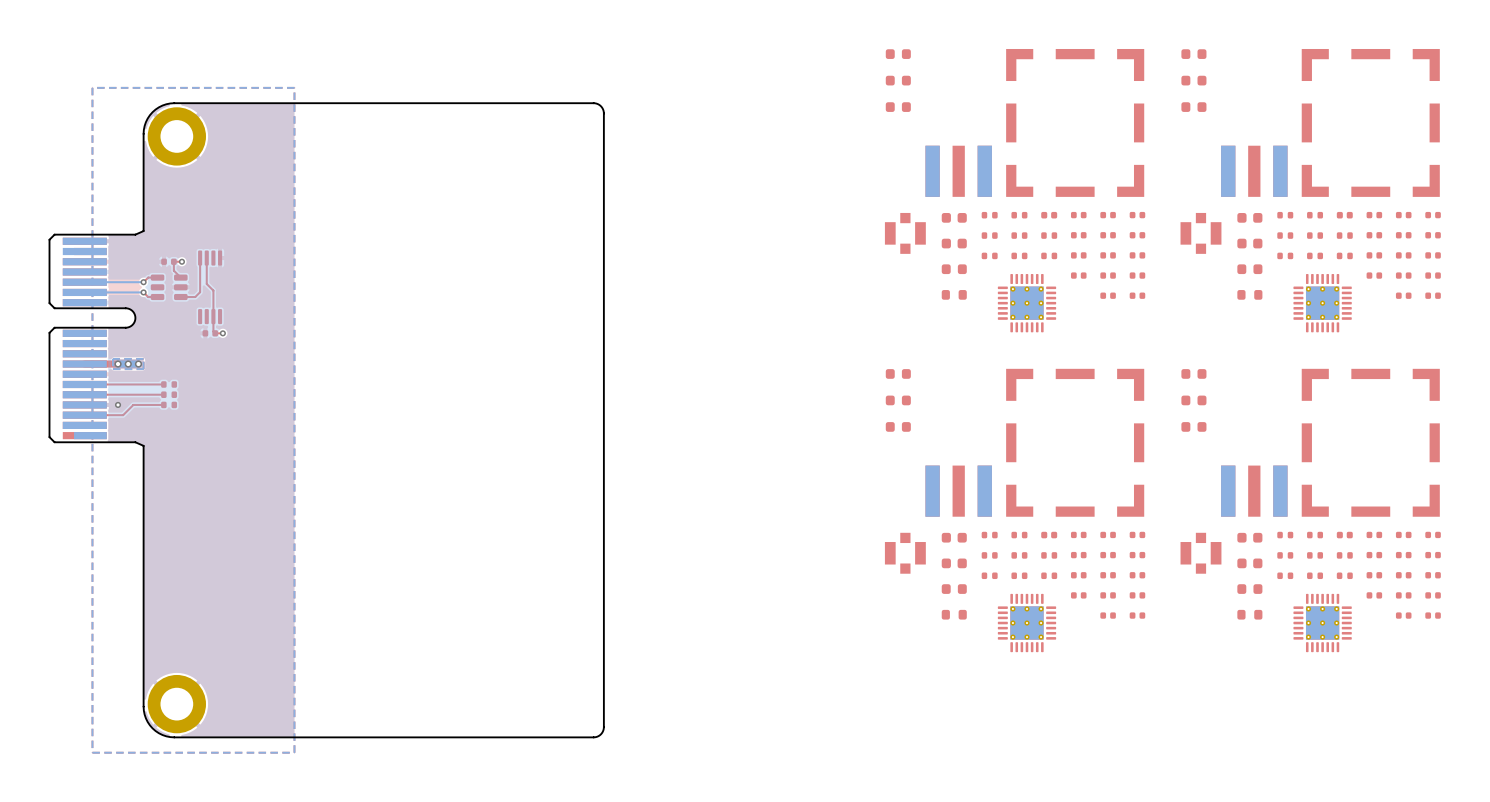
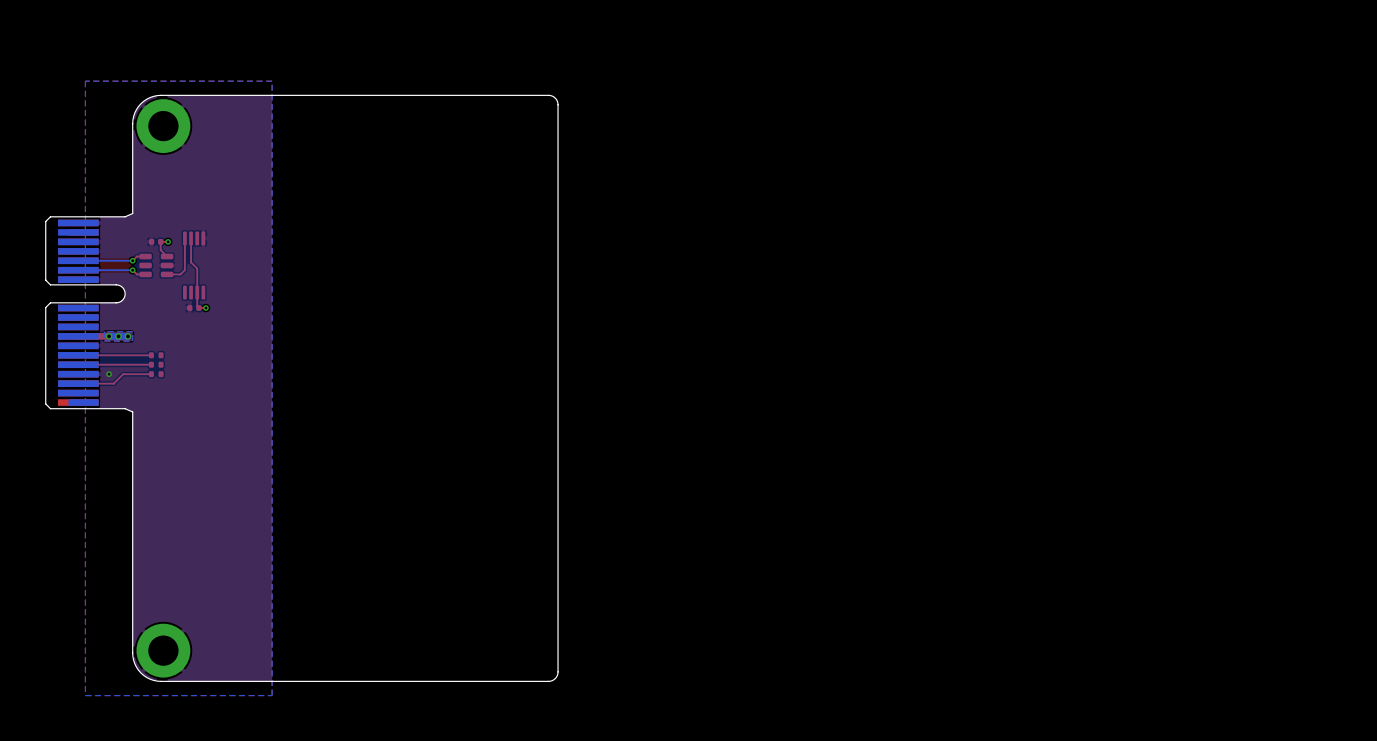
part: (898, 54) -> none
part: (1193, 54) -> none
part: (898, 80) -> none
part: (1193, 80) -> none
part: (898, 107) -> none
part: (1193, 107) -> none
part: (1075, 122) -> none
part: (1370, 122) -> none
part: (958, 171) -> none
part: (1254, 171) -> none
part: (989, 215) -> none
part: (1019, 215) -> none
part: (1049, 215) -> none
part: (1078, 215) -> none
part: (1108, 215) -> none
part: (1137, 215) -> none
part: (1285, 215) -> none
part: (1315, 215) -> none
part: (1344, 215) -> none
part: (1374, 215) -> none
part: (1403, 215) -> none
part: (1433, 215) -> none
part: (954, 217) -> none
part: (1249, 217) -> none
part: (905, 233) -> none
part: (1200, 233) -> none
part: (989, 235) -> none
part: (1019, 235) -> none
part: (1049, 235) -> none
part: (1078, 235) -> none
part: (1108, 235) -> none
part: (1137, 235) -> none
part: (1285, 235) -> none
part: (1315, 235) -> none
part: (1344, 235) -> none
part: (1374, 235) -> none
part: (1403, 235) -> none
part: (1433, 235) -> none
part: (954, 243) -> none
part: (1249, 243) -> none
part: (989, 255) -> none
part: (1019, 255) -> none
part: (1049, 255) -> none
part: (1078, 255) -> none
part: (1108, 255) -> none
part: (1137, 255) -> none
part: (1285, 255) -> none
part: (1315, 255) -> none
part: (1344, 255) -> none
part: (1374, 255) -> none
part: (1403, 255) -> none
part: (1433, 255) -> none
part: (954, 269) -> none
part: (1249, 269) -> none
part: (1078, 275) -> none
part: (1108, 275) -> none
part: (1137, 275) -> none
part: (1374, 275) -> none
part: (1403, 275) -> none
part: (1433, 275) -> none
part: (954, 294) -> none
part: (1249, 294) -> none
part: (1108, 295) -> none
part: (1137, 295) -> none
part: (1403, 295) -> none
part: (1433, 295) -> none
part: (1026, 303) -> none
part: (1322, 303) -> none
part: (898, 373) -> none
part: (1193, 373) -> none
part: (898, 400) -> none
part: (1193, 400) -> none
part: (898, 426) -> none
part: (1193, 426) -> none
part: (1075, 442) -> none
part: (1370, 442) -> none
part: (958, 491) -> none
part: (1254, 491) -> none
part: (1078, 534) -> none
part: (1108, 534) -> none
part: (1137, 534) -> none
part: (1374, 534) -> none
part: (1403, 534) -> none
part: (1433, 534) -> none
part: (989, 535) -> none
part: (1019, 535) -> none
part: (1049, 535) -> none
part: (1285, 535) -> none
part: (1315, 535) -> none
part: (1344, 535) -> none
part: (954, 537) -> none
part: (1249, 537) -> none
part: (905, 553) -> none
part: (1200, 553) -> none
part: (989, 555) -> none
part: (1019, 555) -> none
part: (1049, 555) -> none
part: (1078, 555) -> none
part: (1108, 555) -> none
part: (1137, 555) -> none
part: (1285, 555) -> none
part: (1315, 555) -> none
part: (1344, 555) -> none
part: (1374, 555) -> none
part: (1403, 555) -> none
part: (1433, 555) -> none
part: (954, 563) -> none
part: (1249, 563) -> none
part: (989, 575) -> none
part: (1019, 575) -> none
part: (1049, 575) -> none
part: (1078, 575) -> none
part: (1108, 575) -> none
part: (1137, 575) -> none
part: (1285, 575) -> none
part: (1315, 575) -> none
part: (1344, 575) -> none
part: (1374, 575) -> none
part: (1403, 575) -> none
part: (1433, 575) -> none
part: (954, 589) -> none
part: (1249, 589) -> none
part: (1078, 595) -> none
part: (1108, 595) -> none
part: (1137, 595) -> none
part: (1374, 595) -> none
part: (1403, 595) -> none
part: (1433, 595) -> none
part: (954, 614) -> none
part: (1249, 614) -> none
part: (1108, 615) -> none
part: (1137, 615) -> none
part: (1403, 615) -> none
part: (1433, 615) -> none
part: (1026, 623) -> none
part: (1322, 623) -> none

